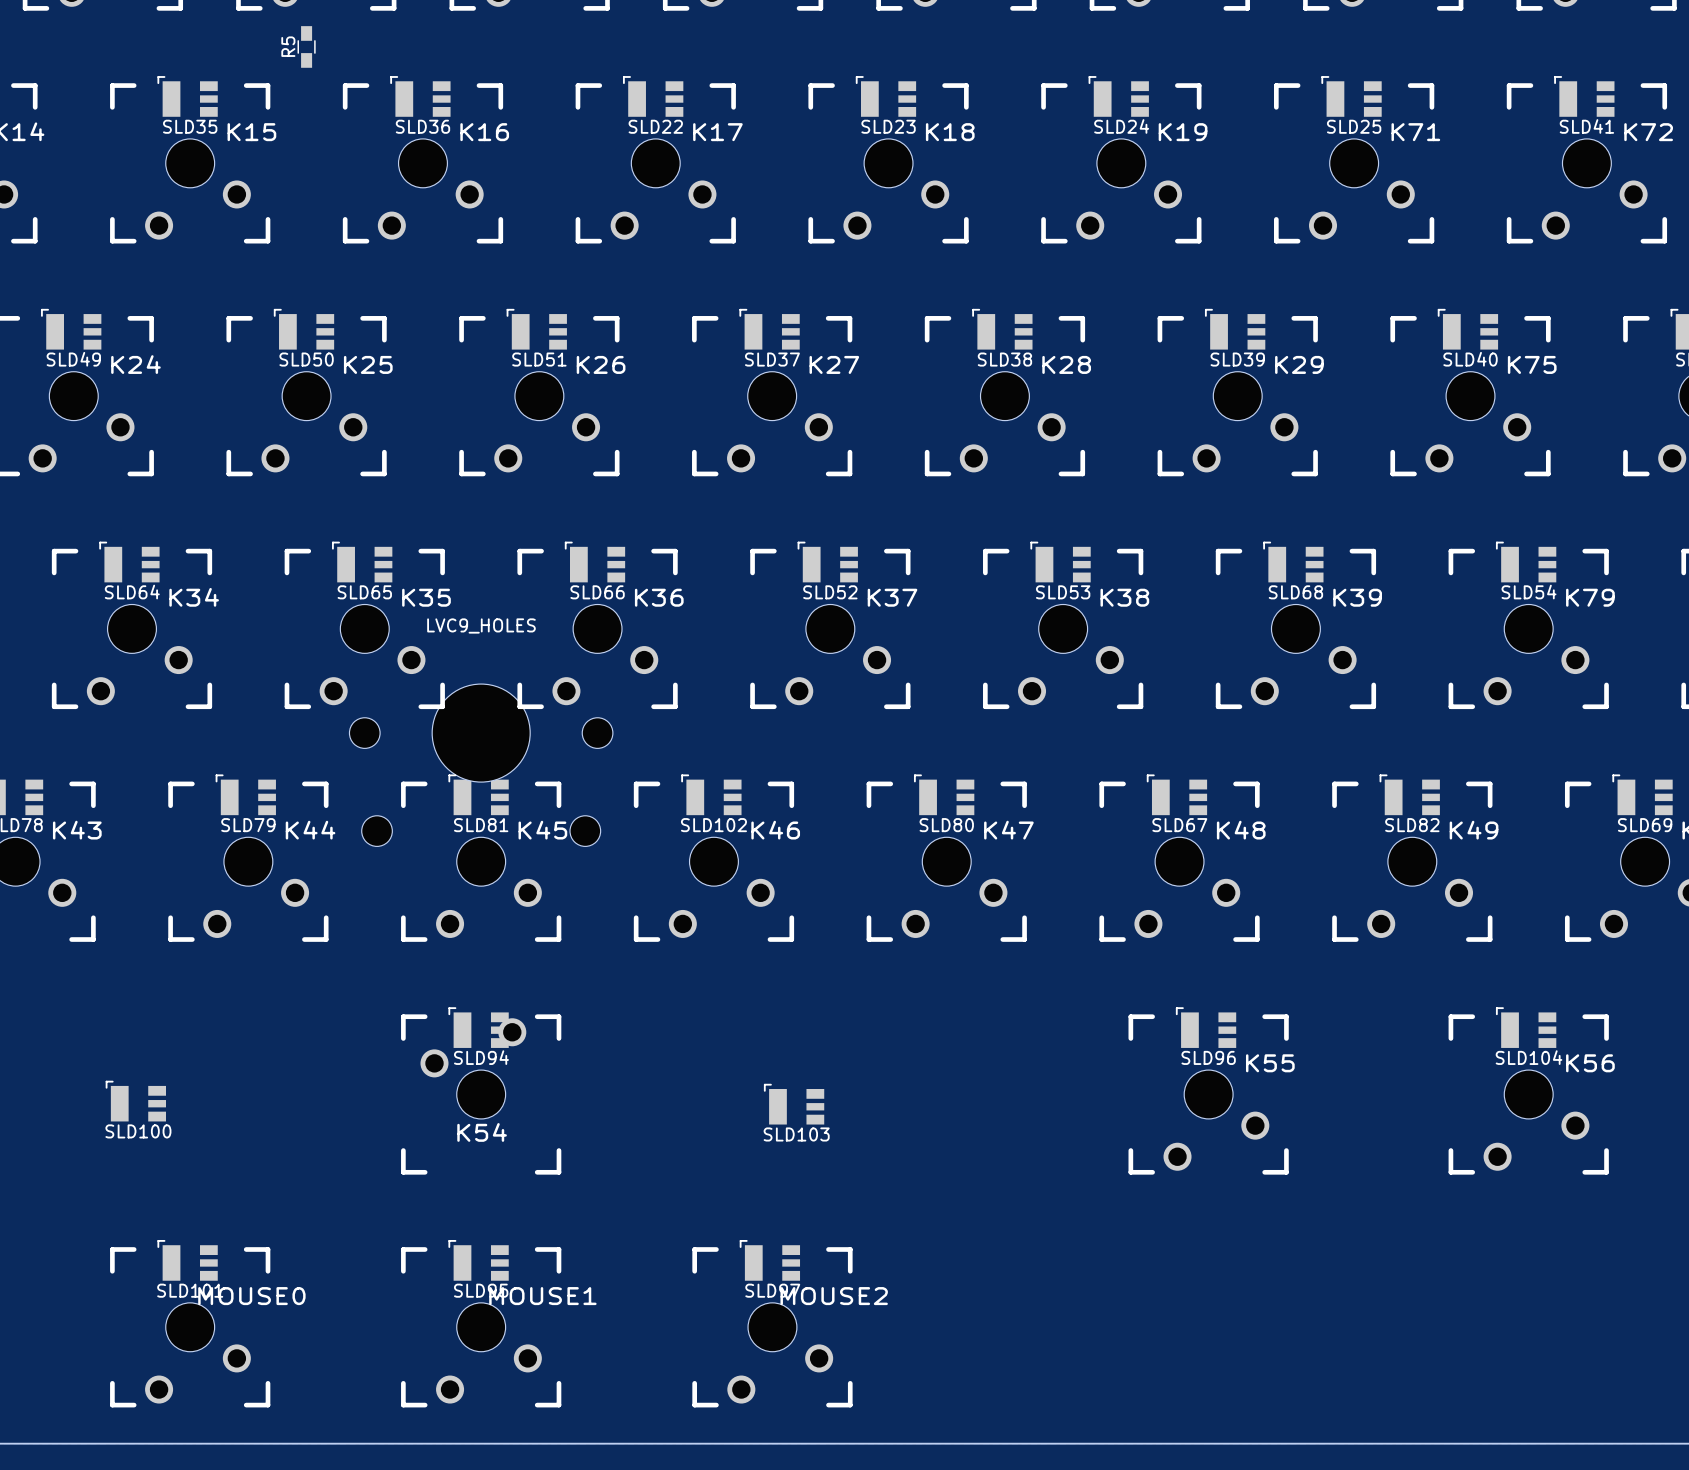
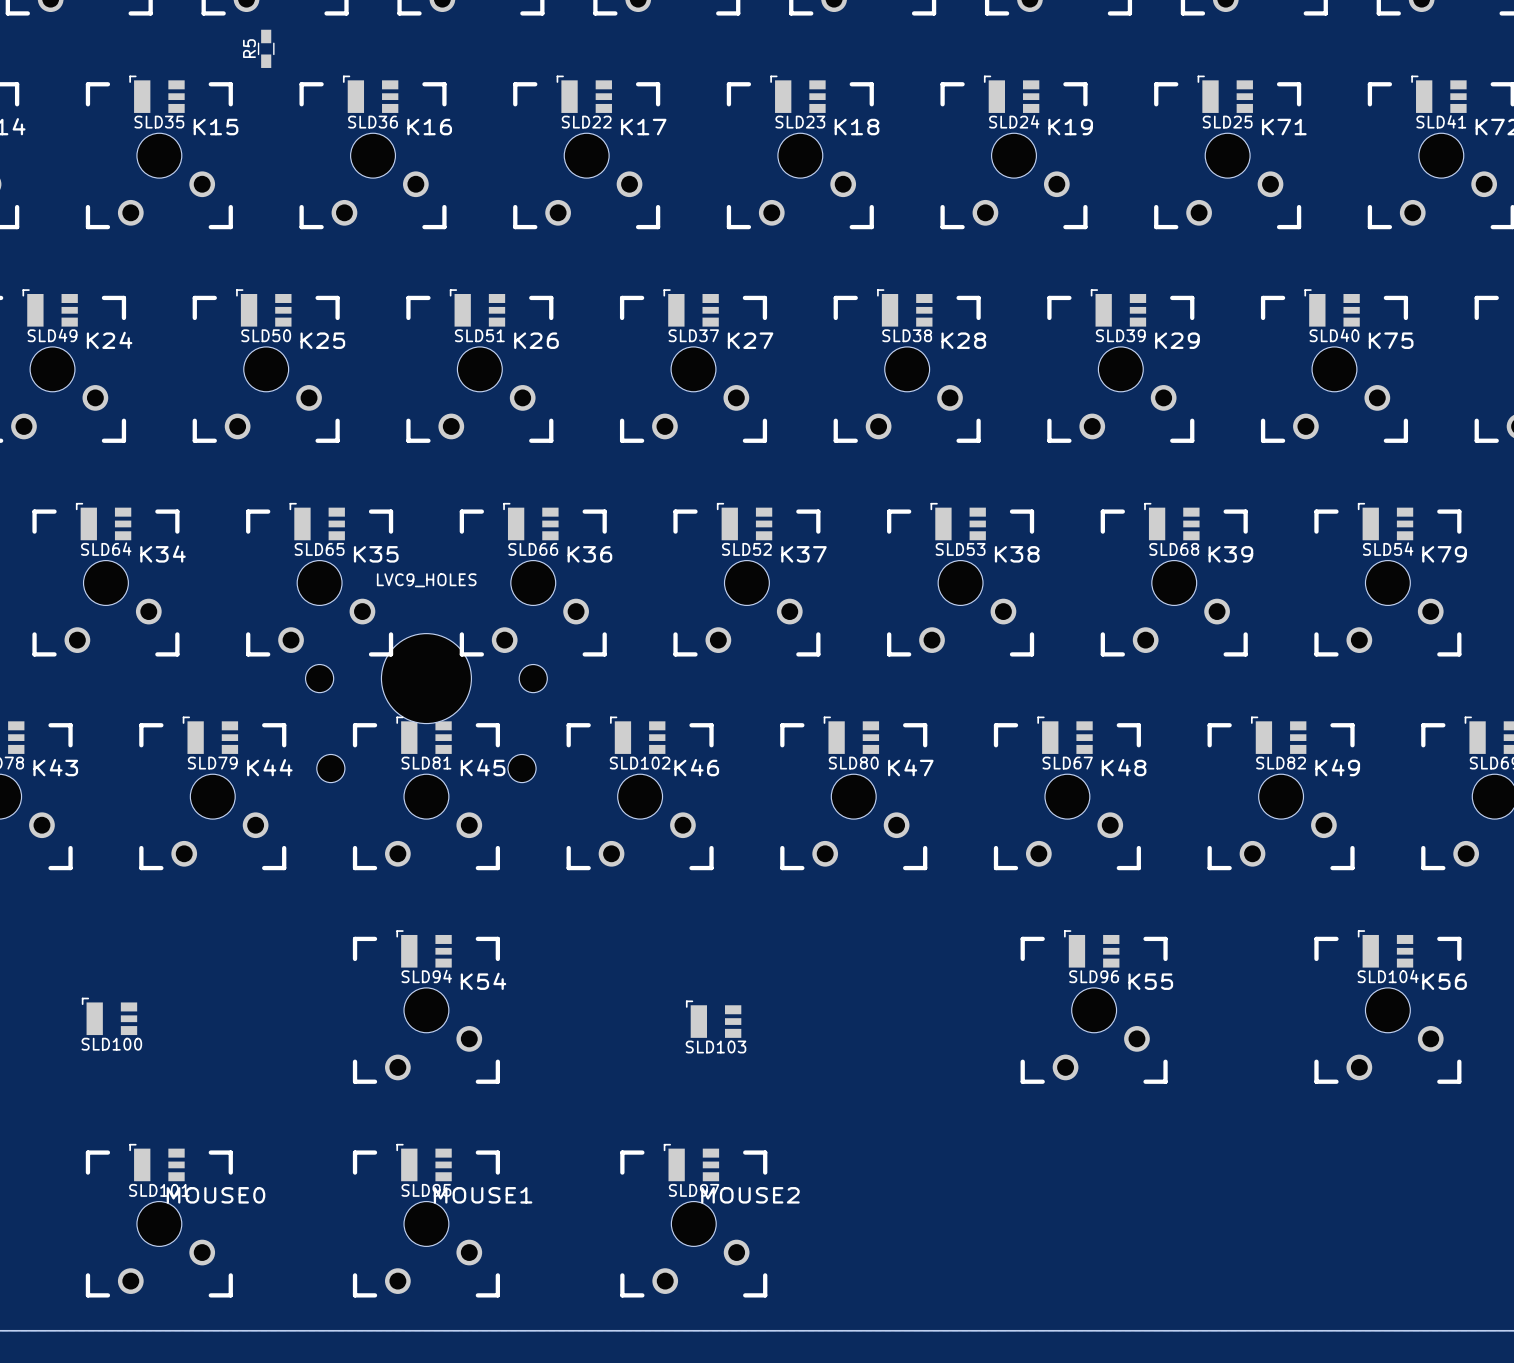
K54 rotation: 0° (481, 1094) -> 180° (426, 1010)
K54 name position: K54 (482, 1132) -> K54 (483, 981)

